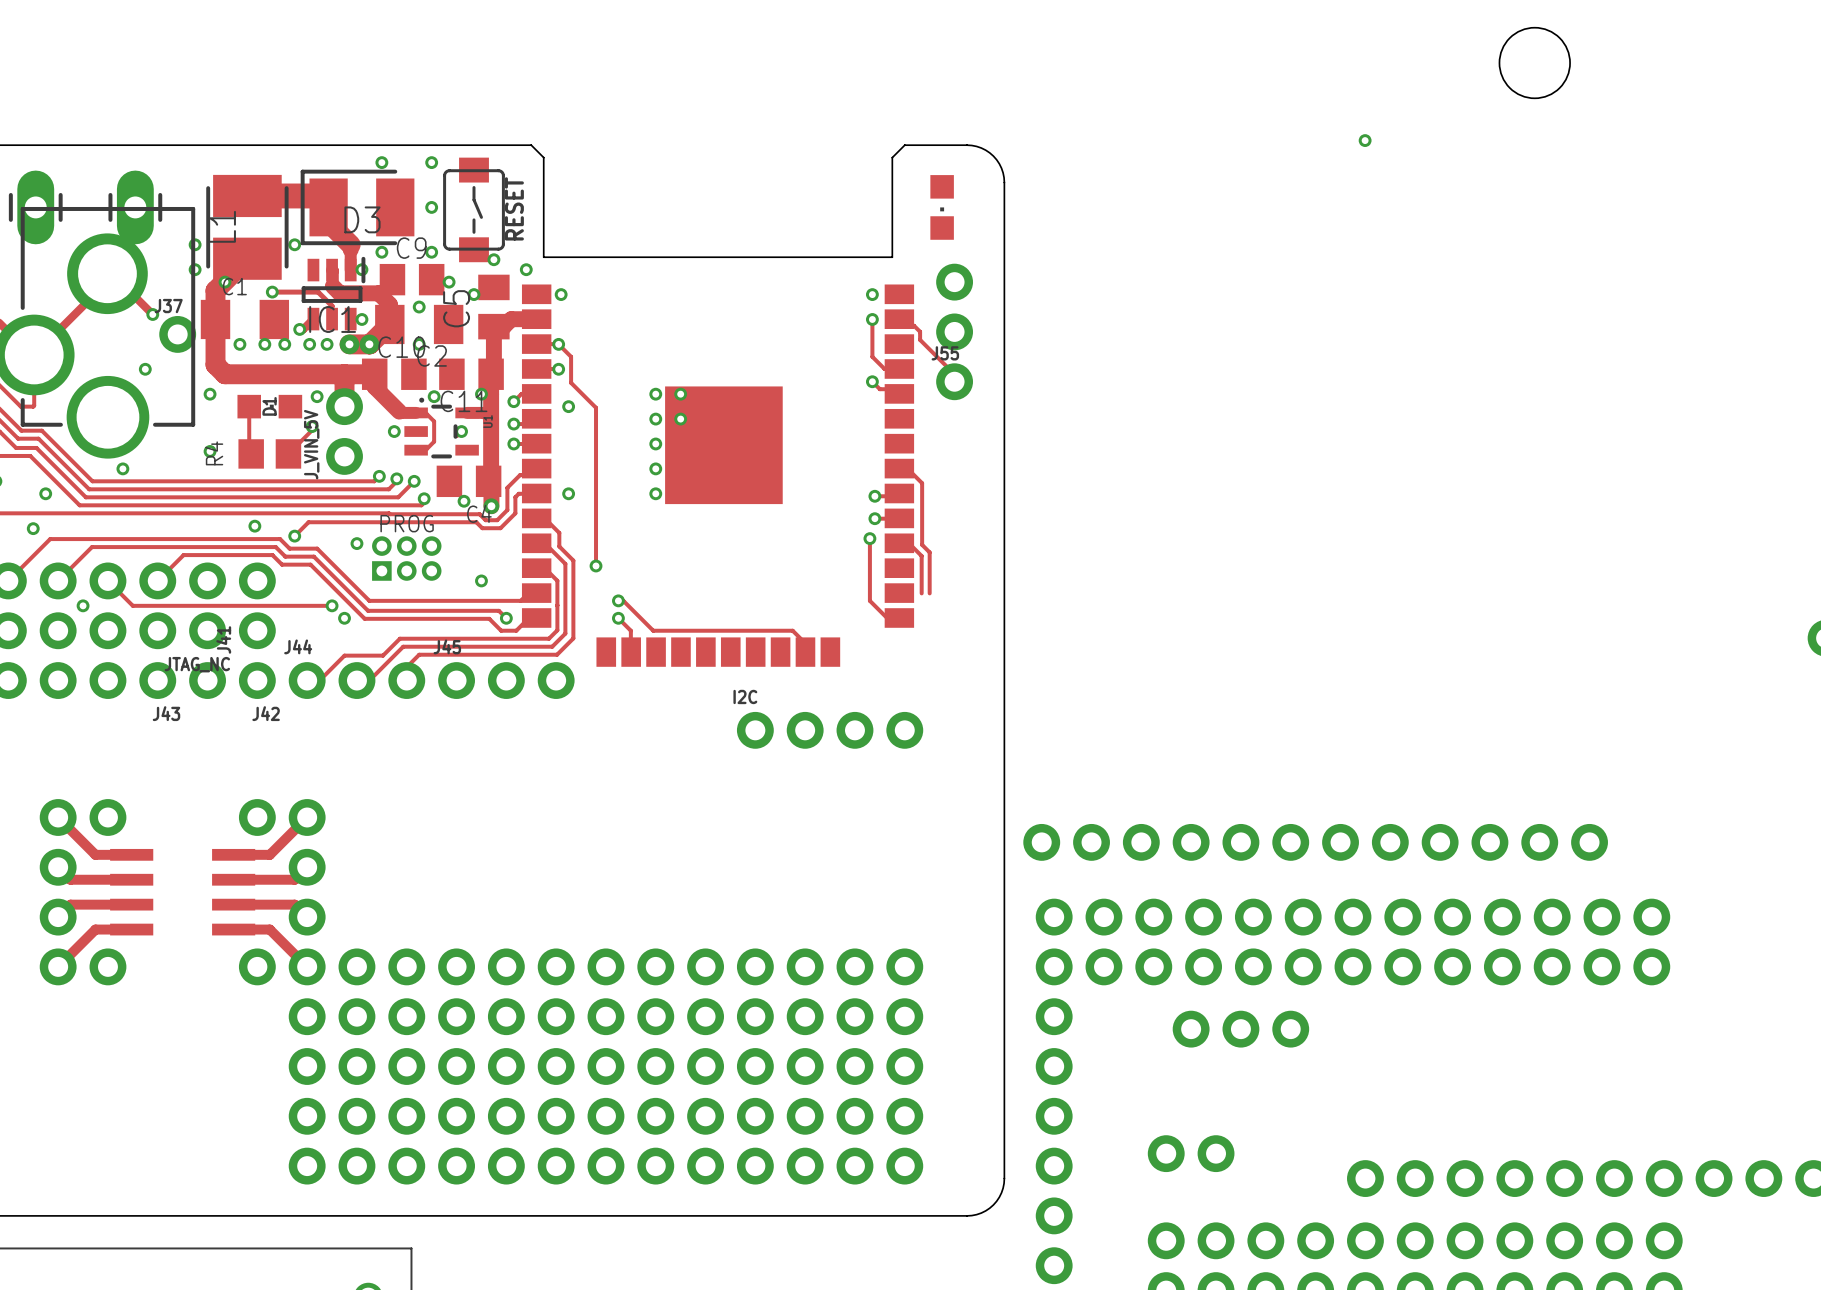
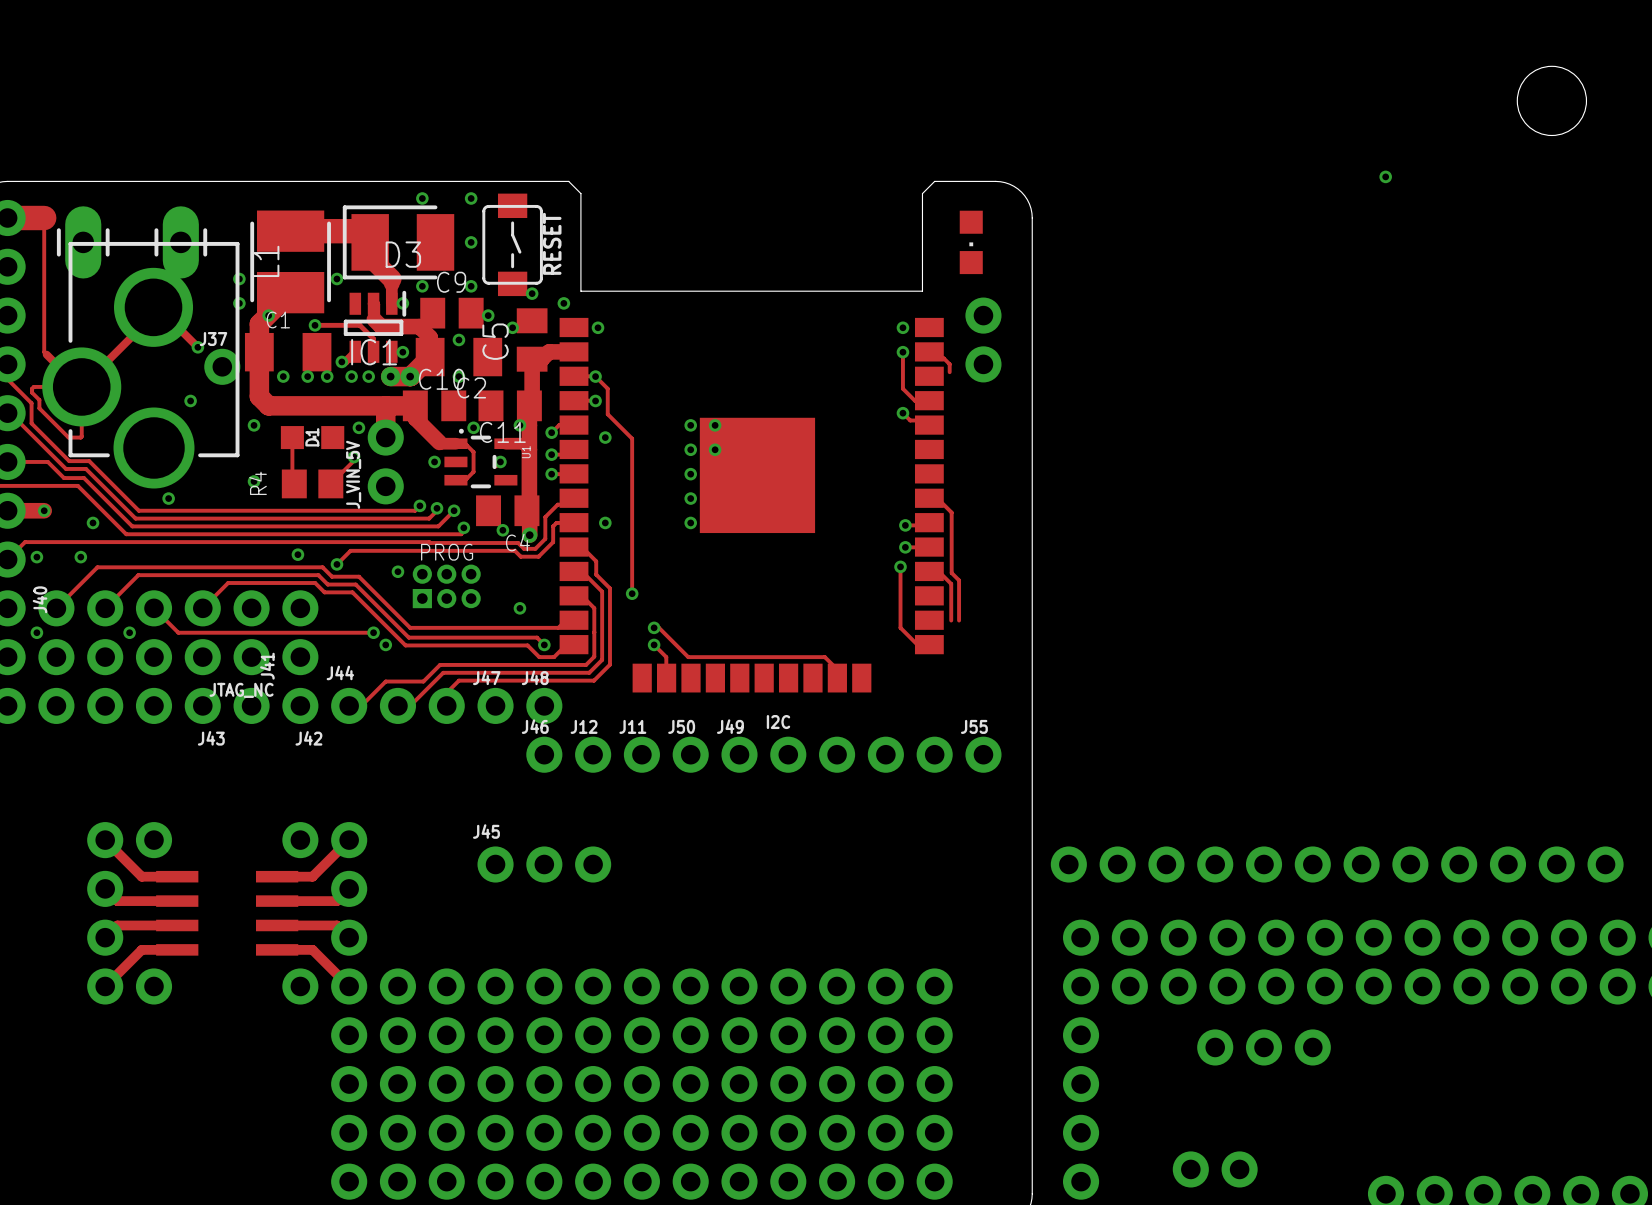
track: (920, 339) (954, 374) (954, 381) -> none
J55 position: (954, 381) -> (983, 754)
J47: none -> (495, 705)
J45 position: (506, 680) -> (544, 864)
J48: none -> (544, 705)
J46: none -> (544, 754)
J12: none -> (593, 754)
J11: none -> (641, 754)
J50: none -> (690, 754)
J49: none -> (739, 754)

